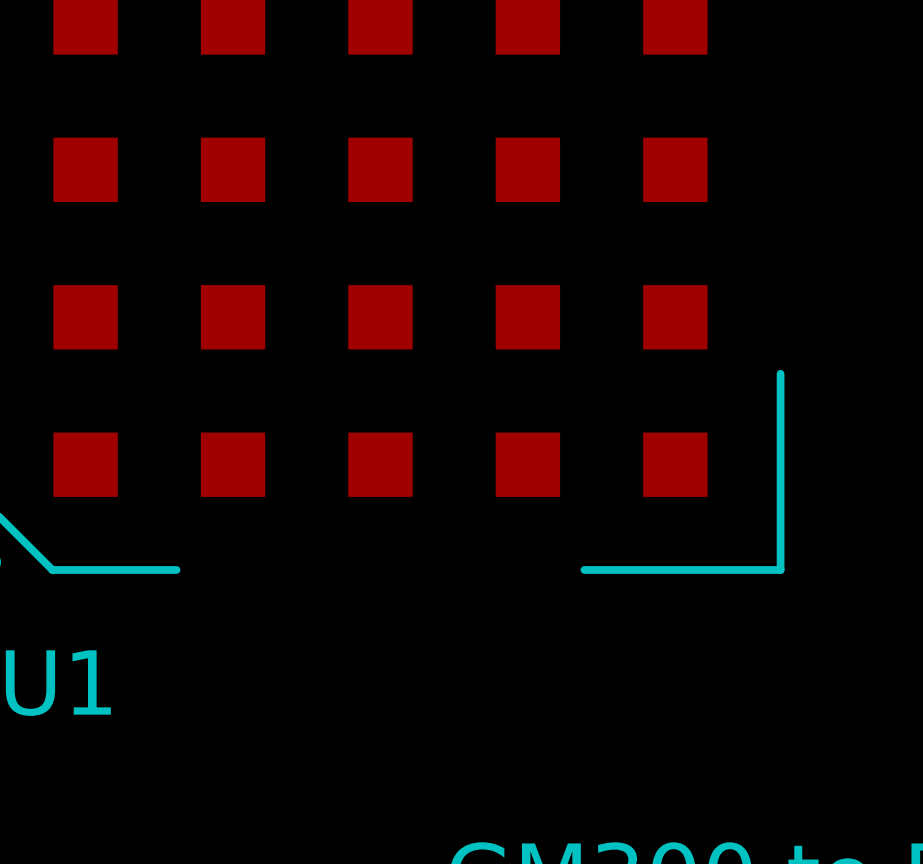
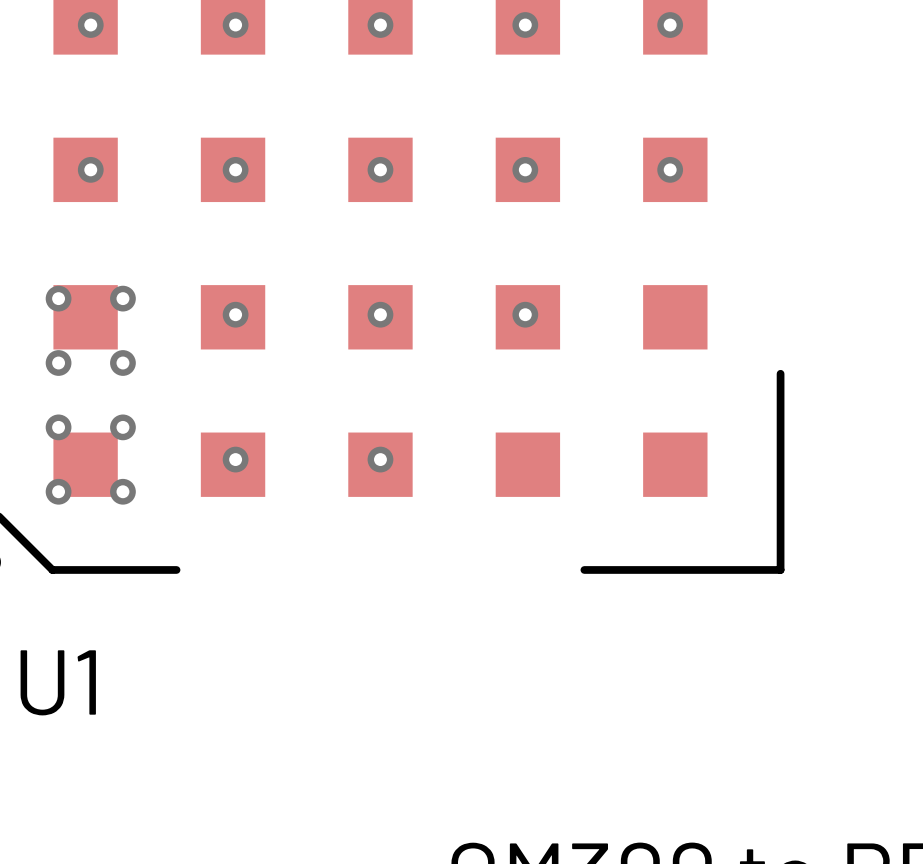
via: none -> (90, 25)
via: none -> (235, 25)
via: none -> (380, 25)
via: none -> (525, 25)
via: none -> (670, 25)
via: none -> (90, 169)
via: none -> (235, 169)
via: none -> (380, 169)
via: none -> (525, 169)
via: none -> (670, 169)
via: none -> (58, 298)
via: none -> (122, 298)
via: none -> (235, 314)
via: none -> (380, 314)
via: none -> (525, 314)
via: none -> (58, 363)
via: none -> (122, 363)
via: none -> (58, 427)
via: none -> (122, 427)
via: none -> (235, 459)
via: none -> (380, 459)
via: none -> (58, 491)
via: none -> (122, 491)

